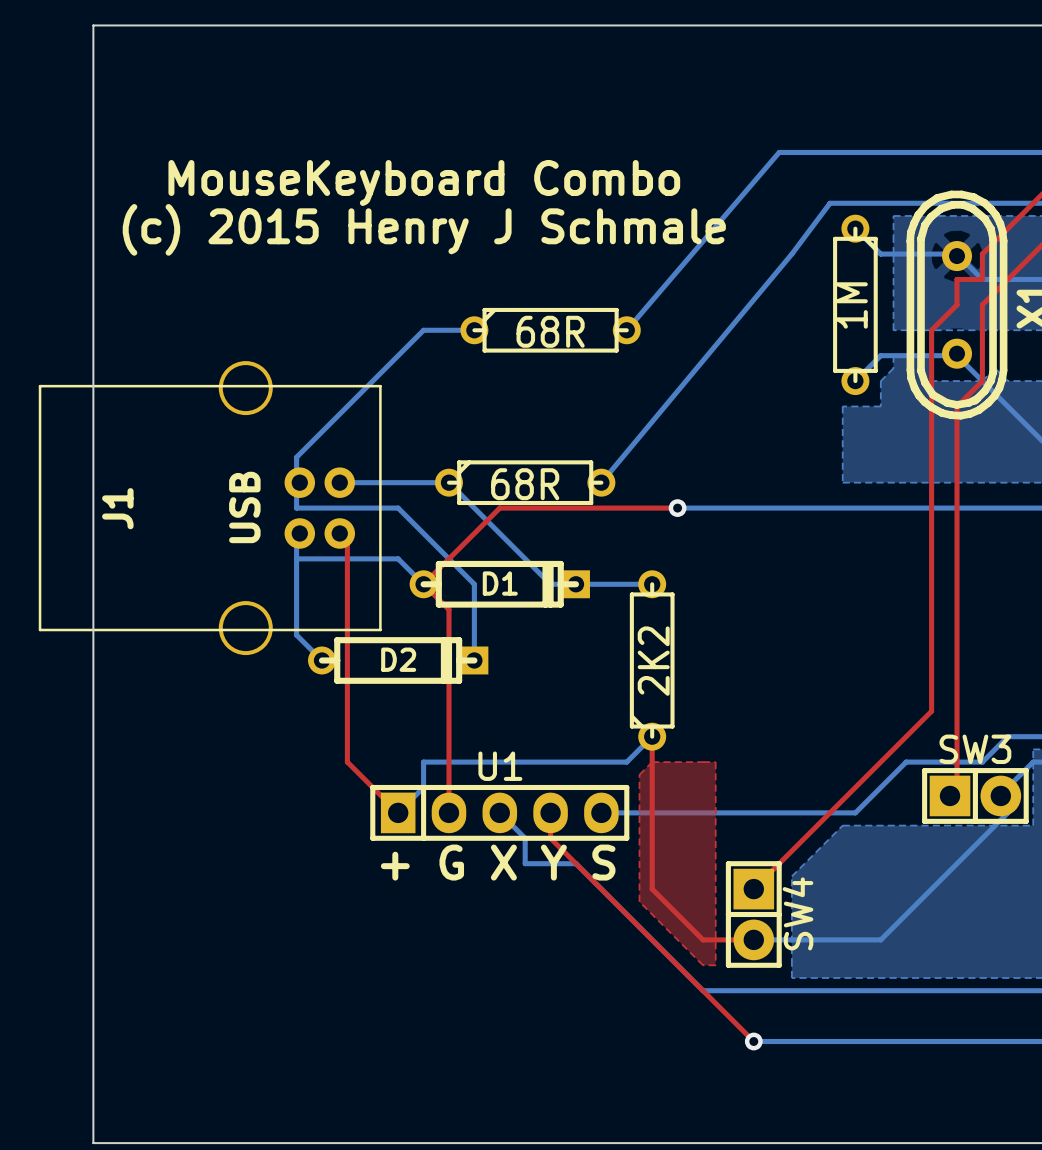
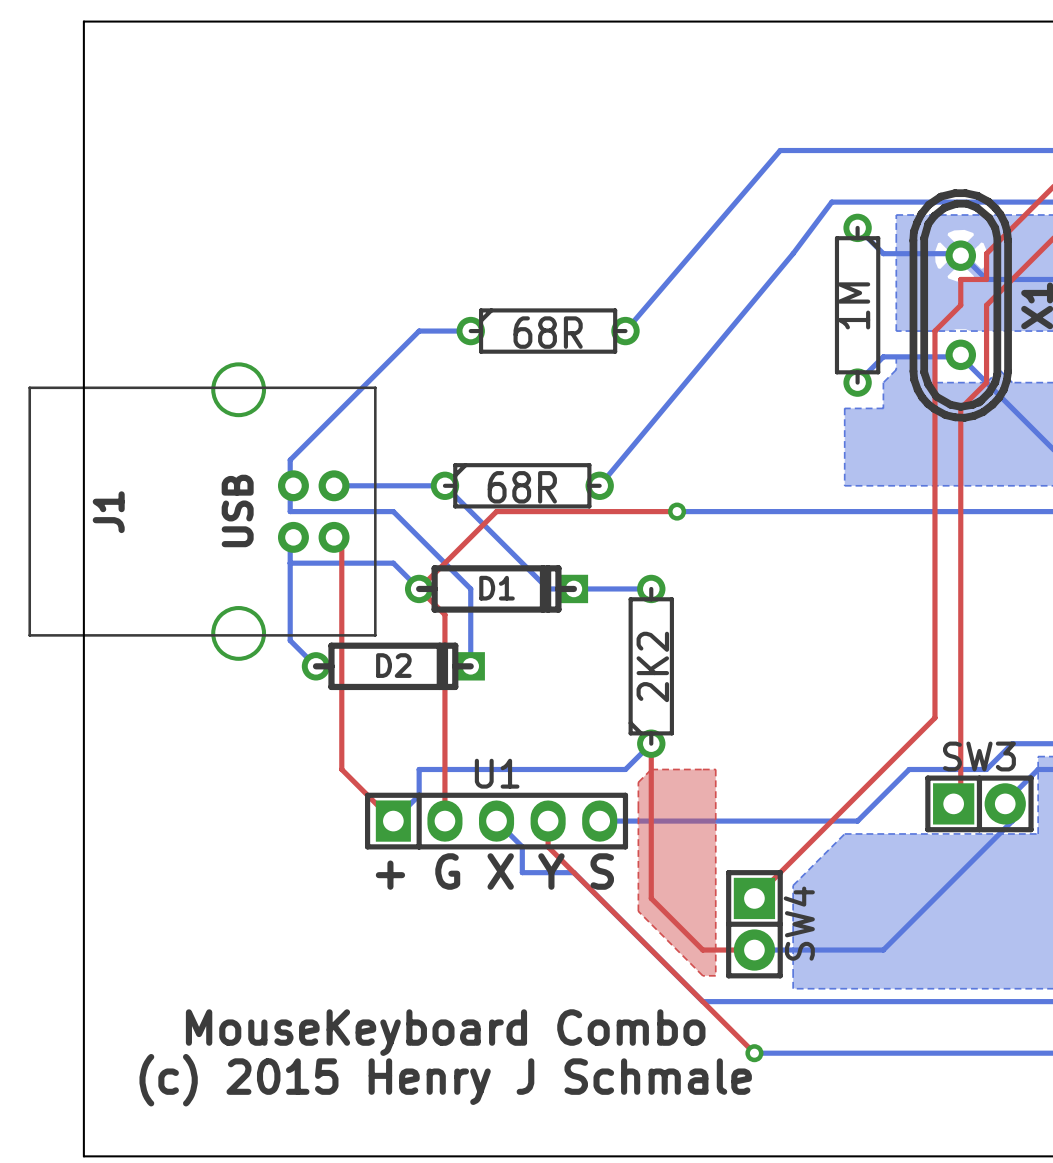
text: MouseKeyboard Combo (424, 182) -> none
text: (c) 2015 Henry J Schmale (424, 229) -> none
text: none -> MouseKeyboard Combo (445, 1032)
text: none -> (c) 2015 Henry J Schmale (445, 1080)

